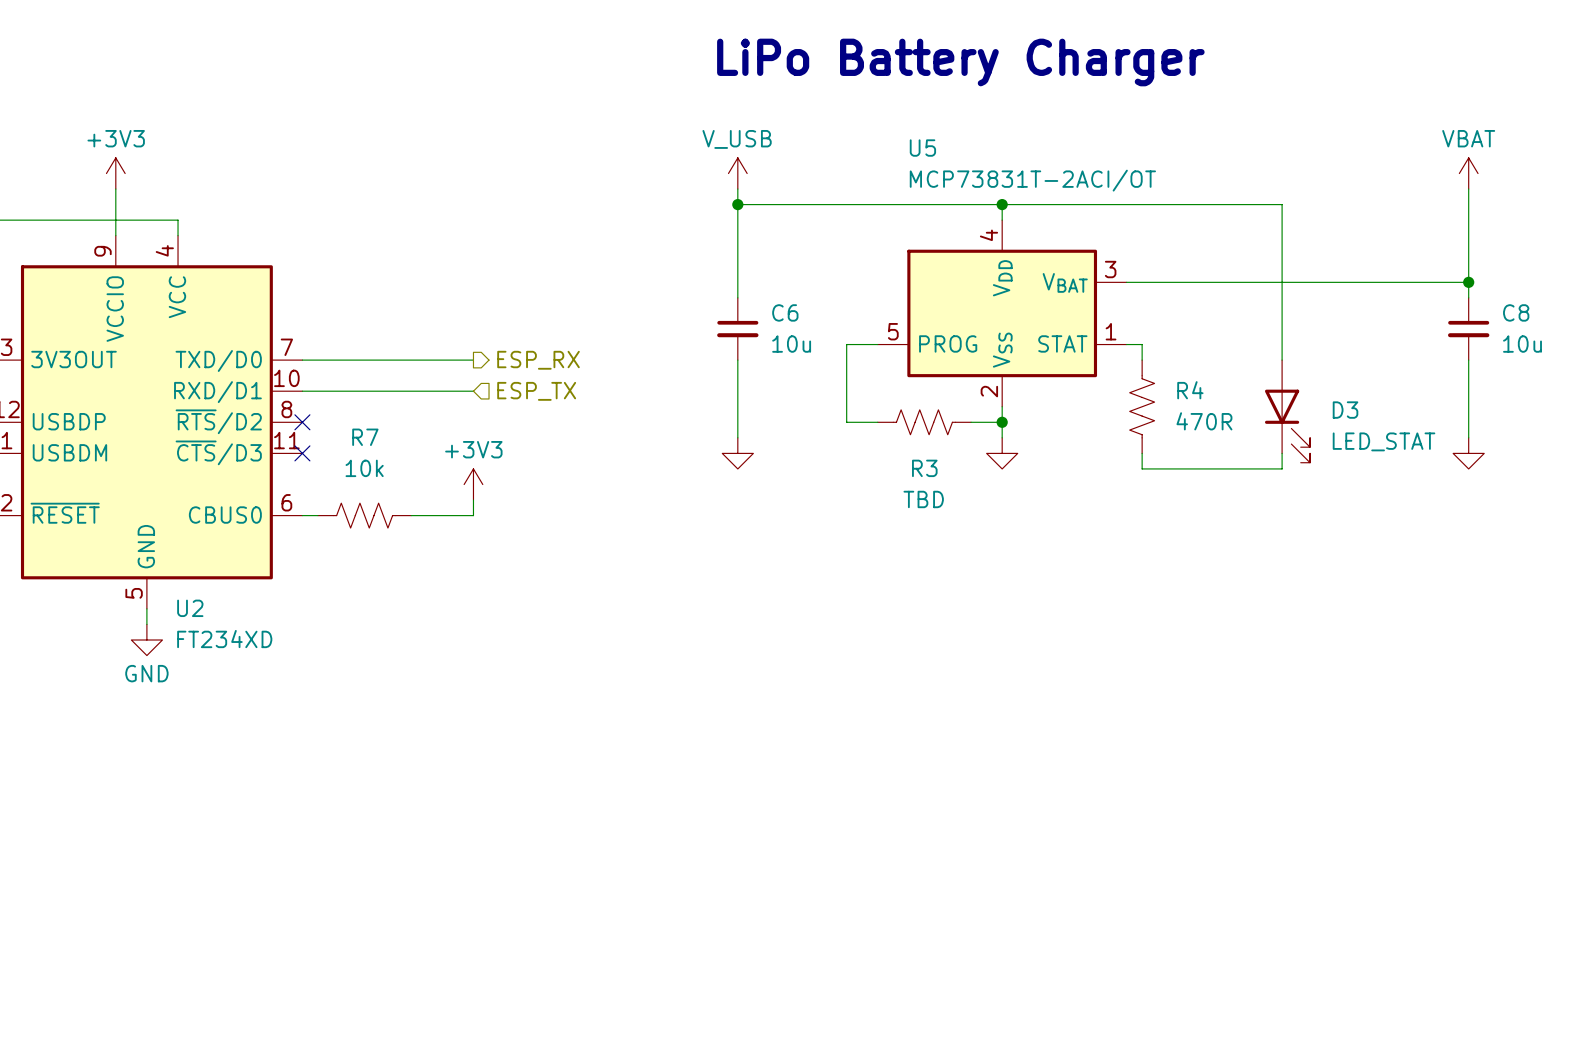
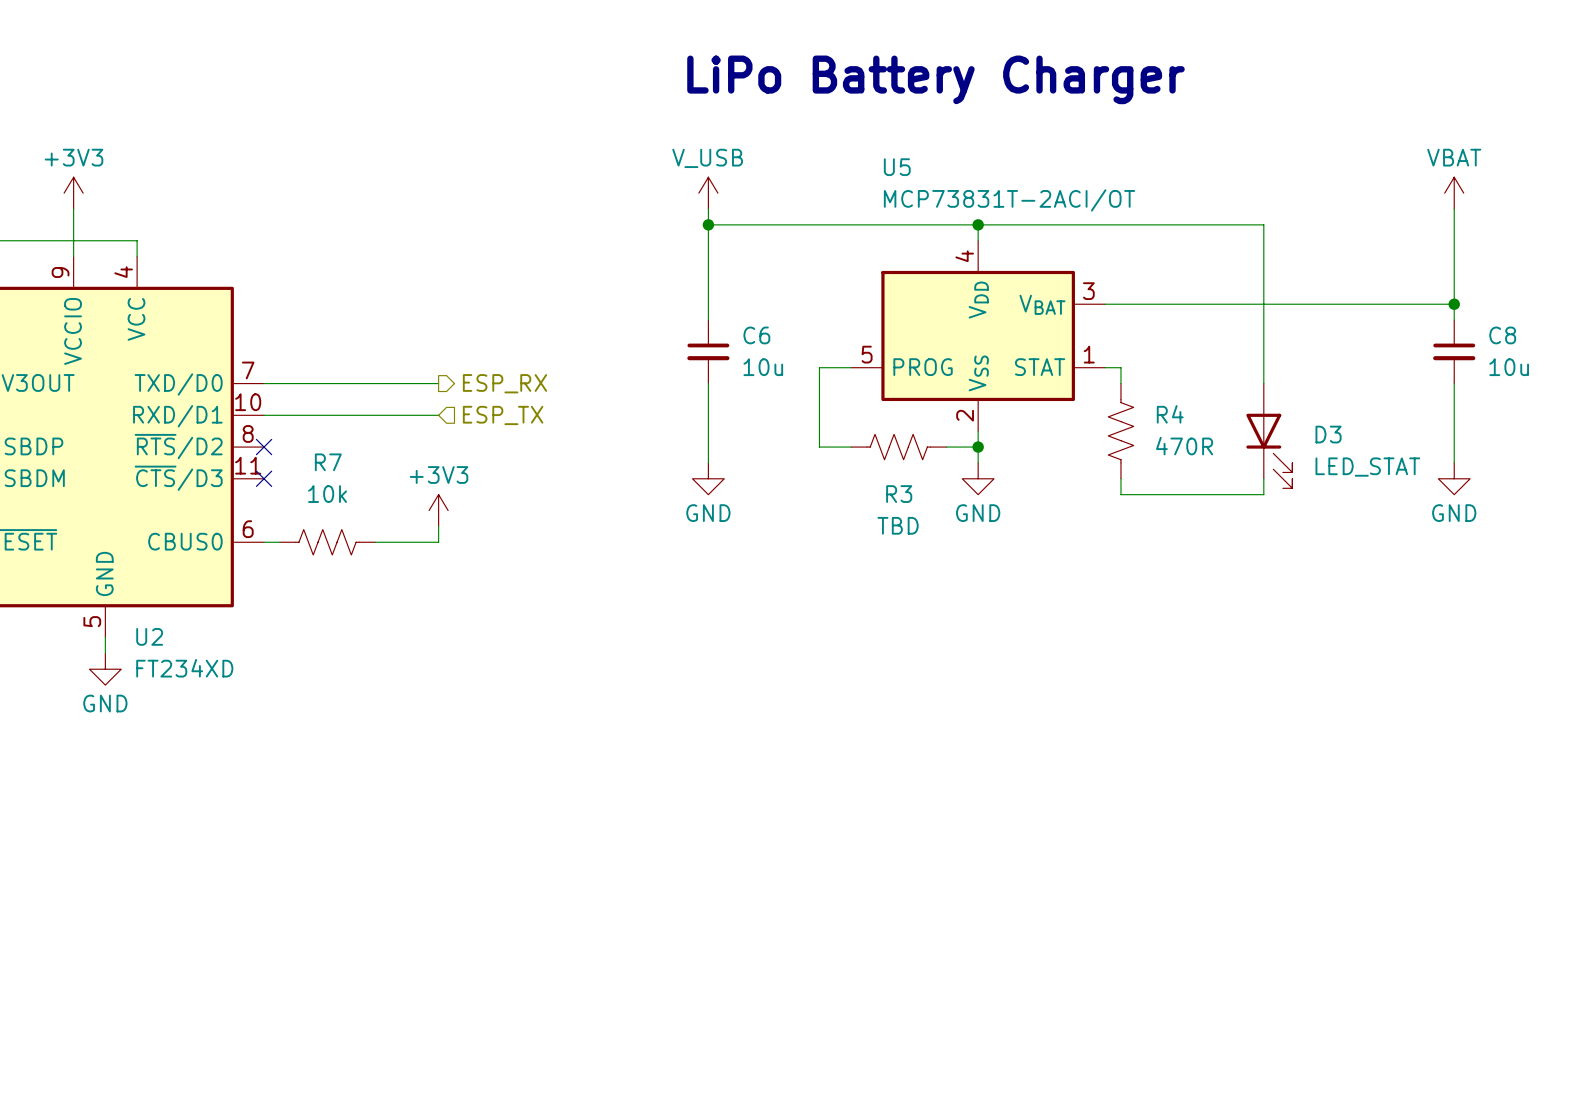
power symbol text: none -> GND (708, 513)
power symbol text: none -> GND (978, 513)
power symbol text: none -> GND (1454, 513)

